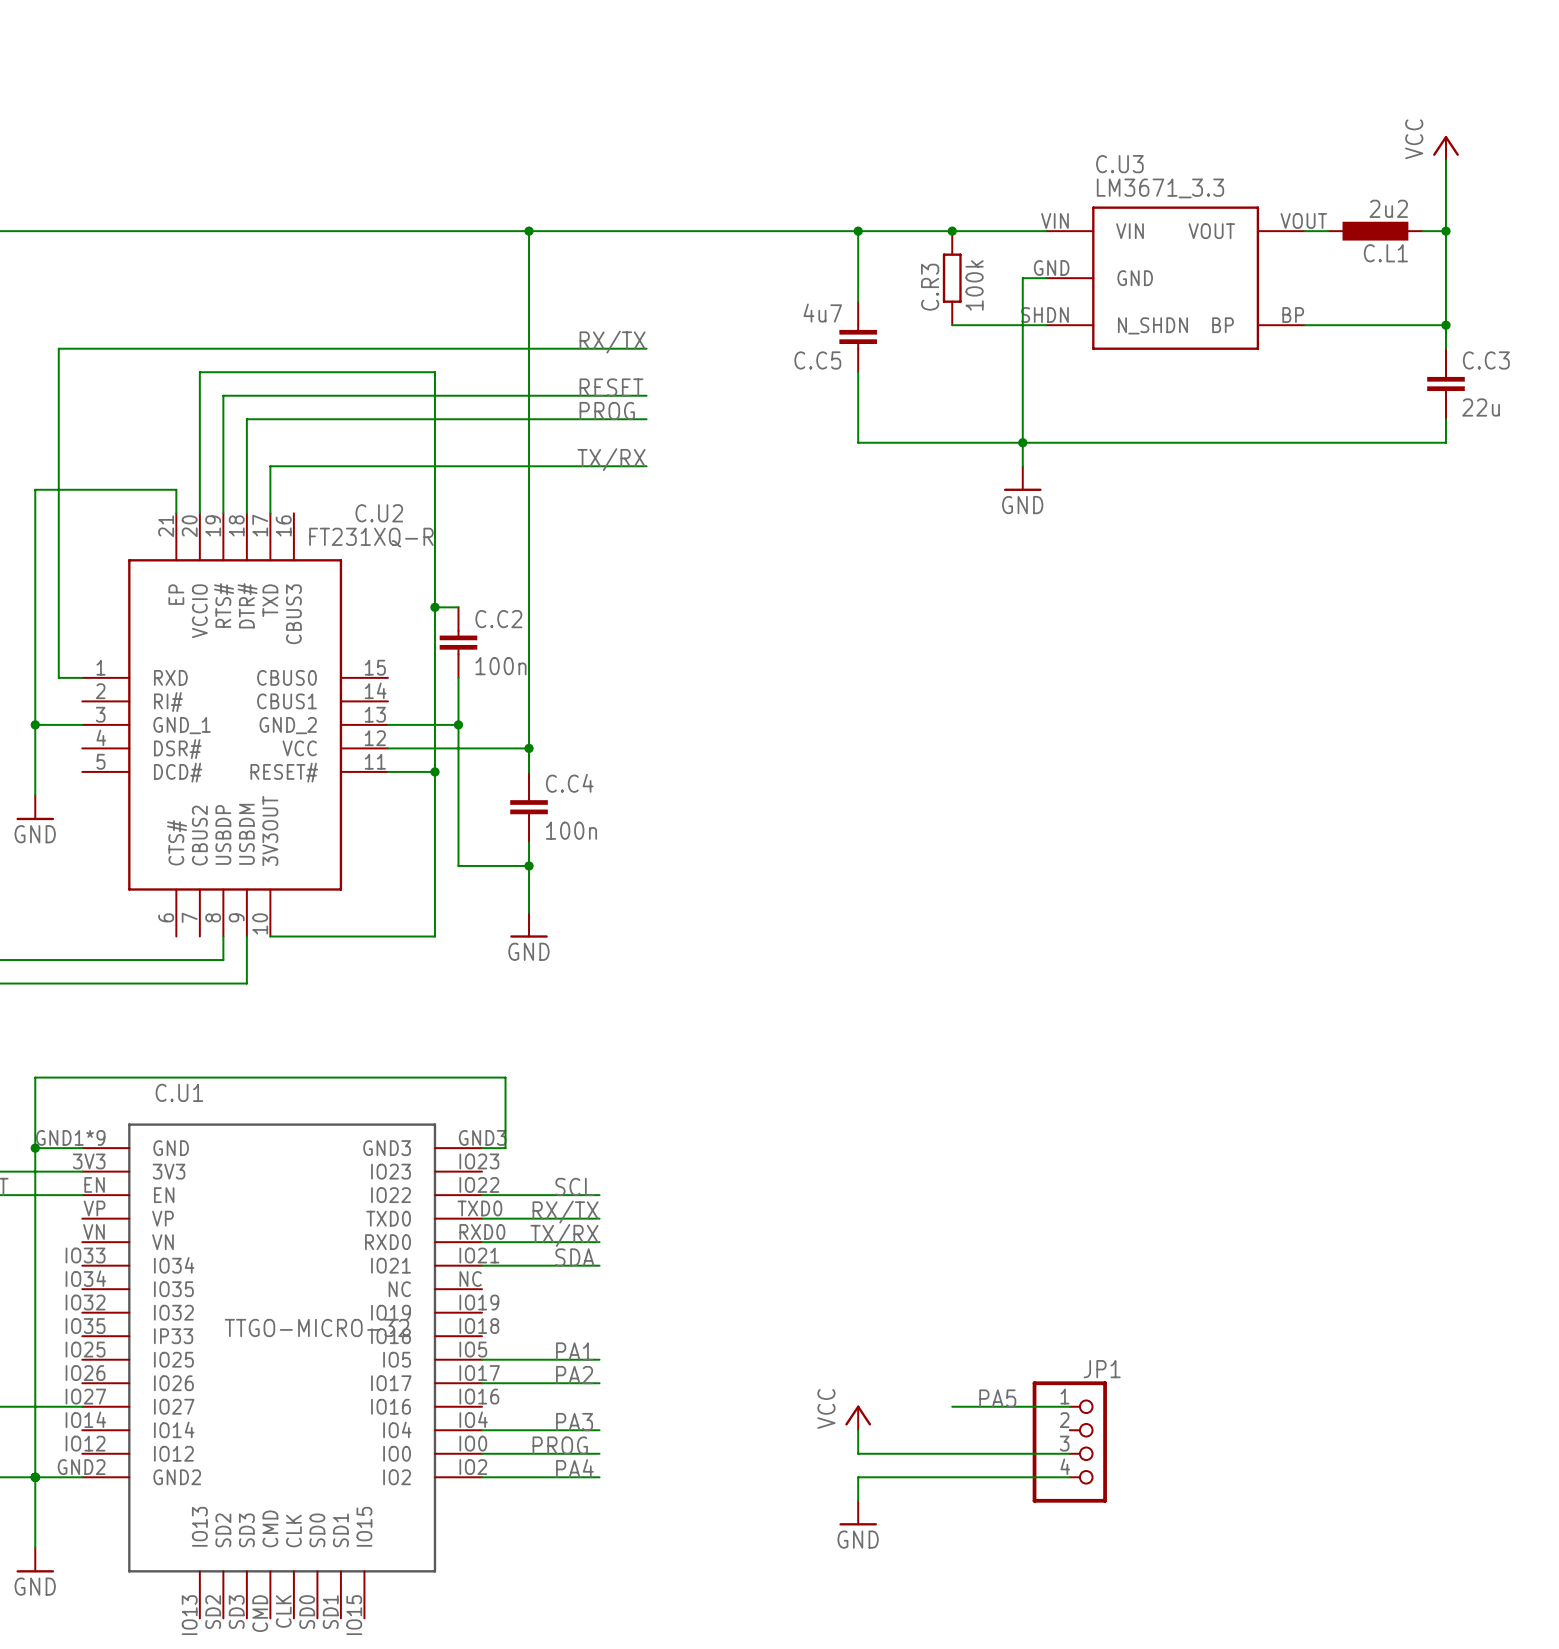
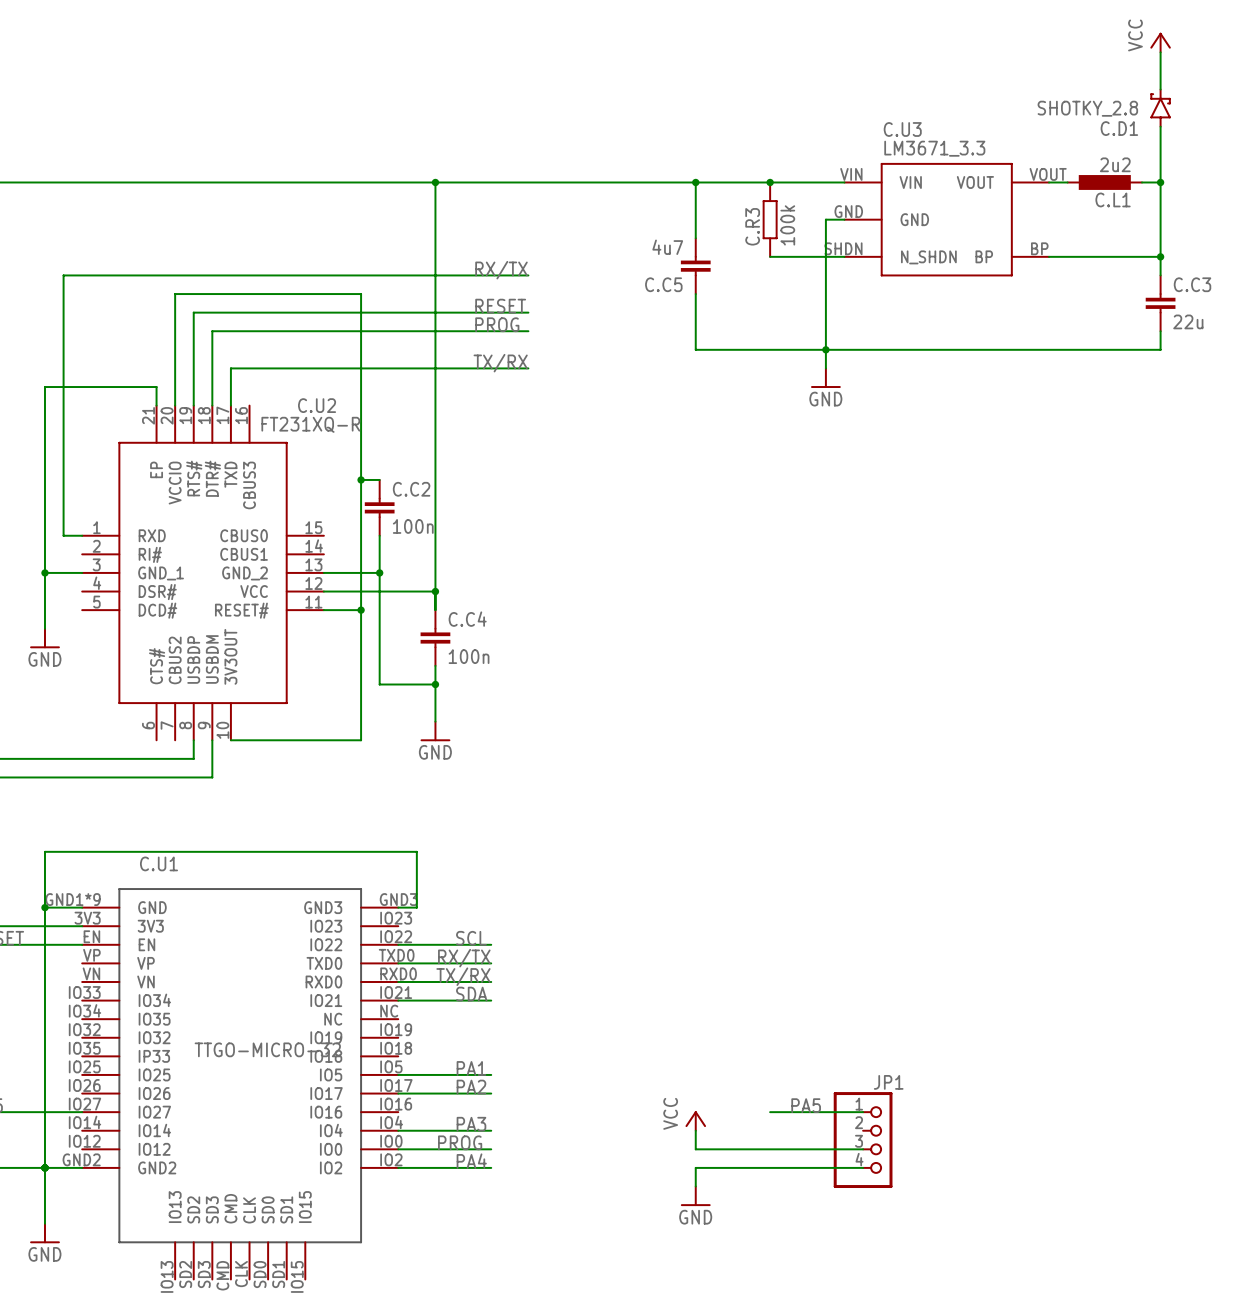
wire: none -> (1160, 52) (1160, 89)
C.D1: none -> SHOTKY_2.8 (1160, 108)
power symbol position: VCC (1445, 148) -> VCC (1160, 42)

